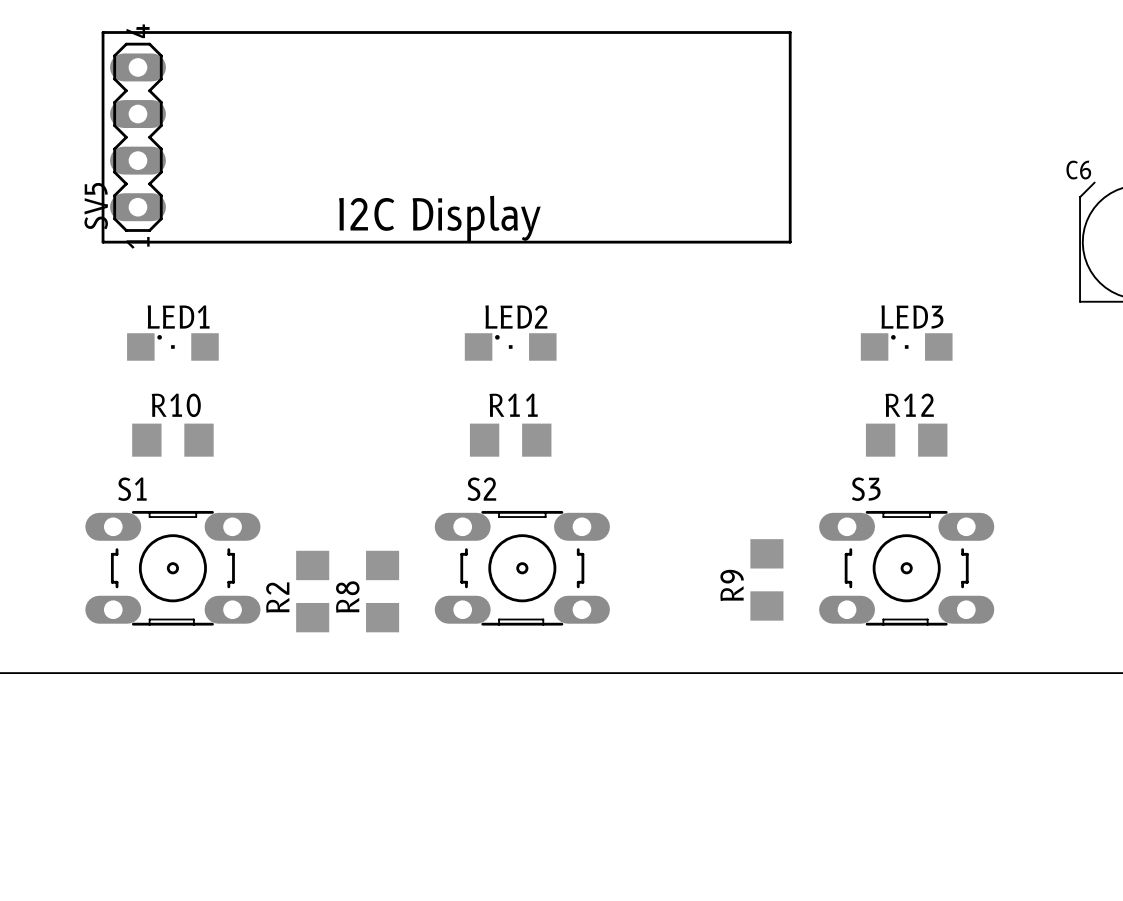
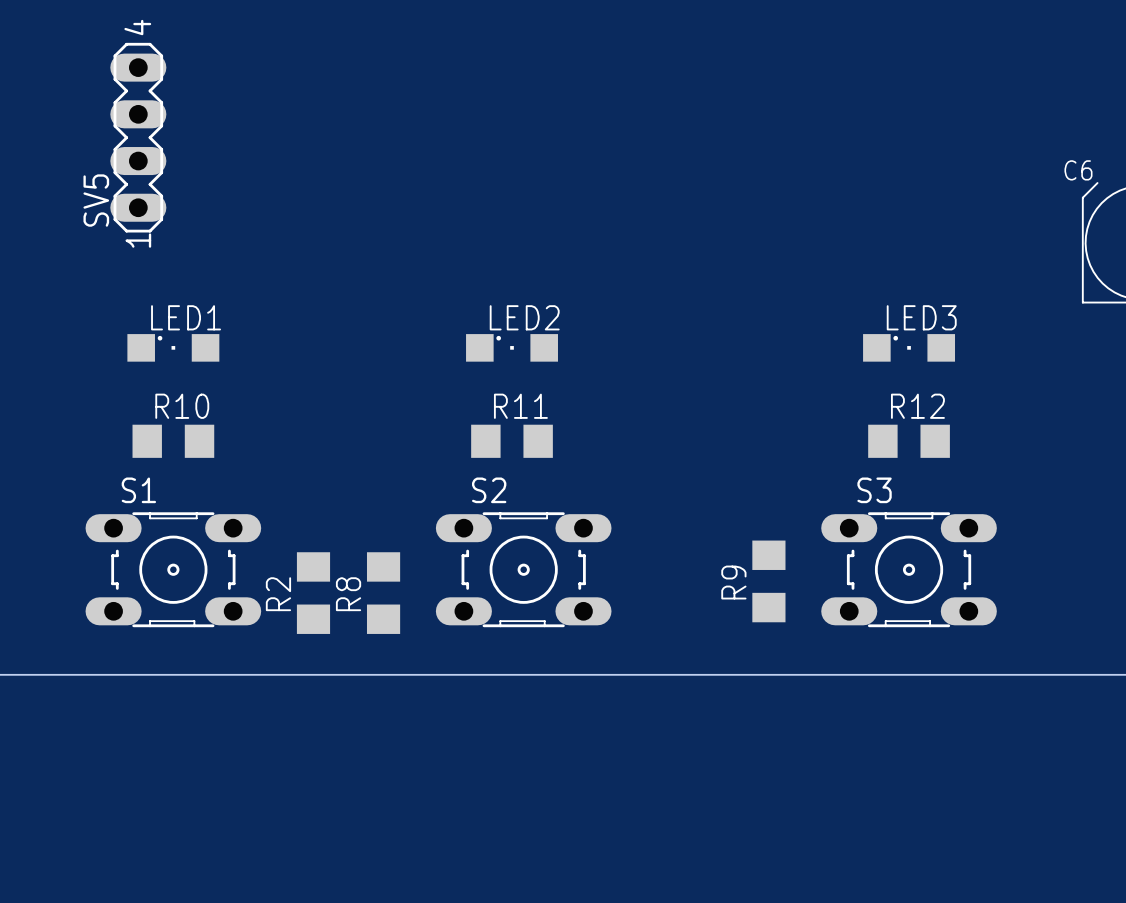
line: (103, 32) (790, 32) (790, 242) (103, 242) (103, 32) -> none
text: I2C Display (439, 218) -> none

